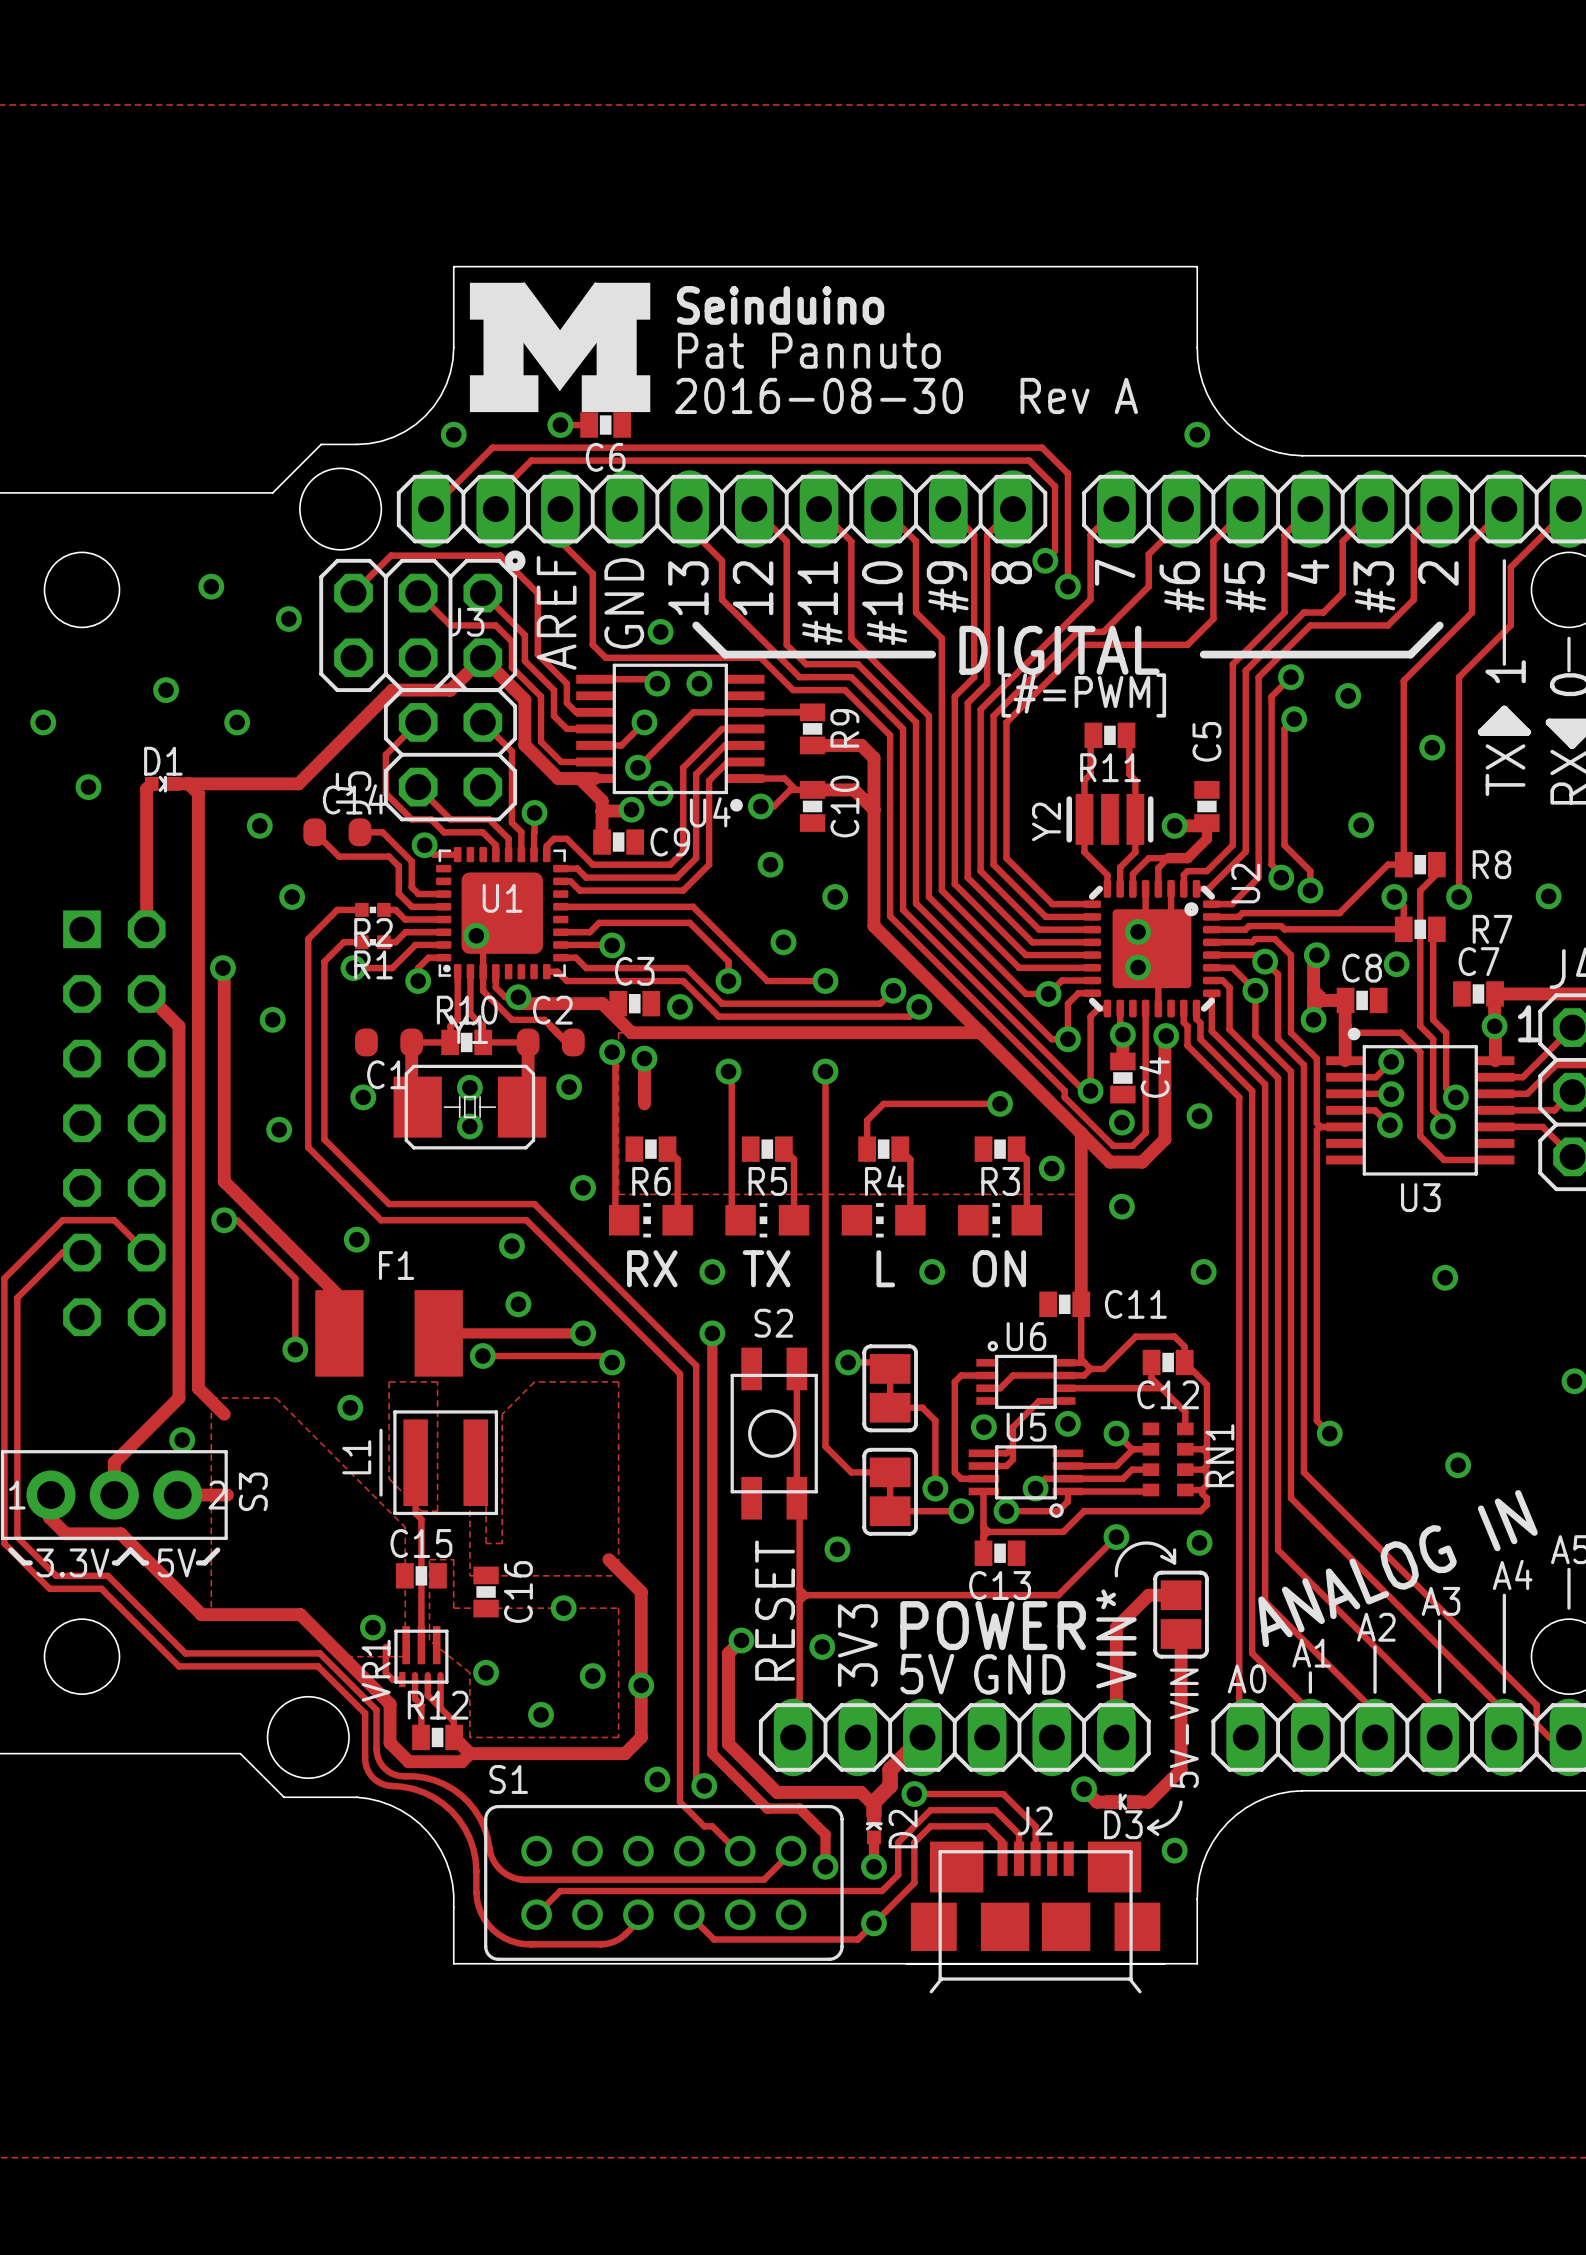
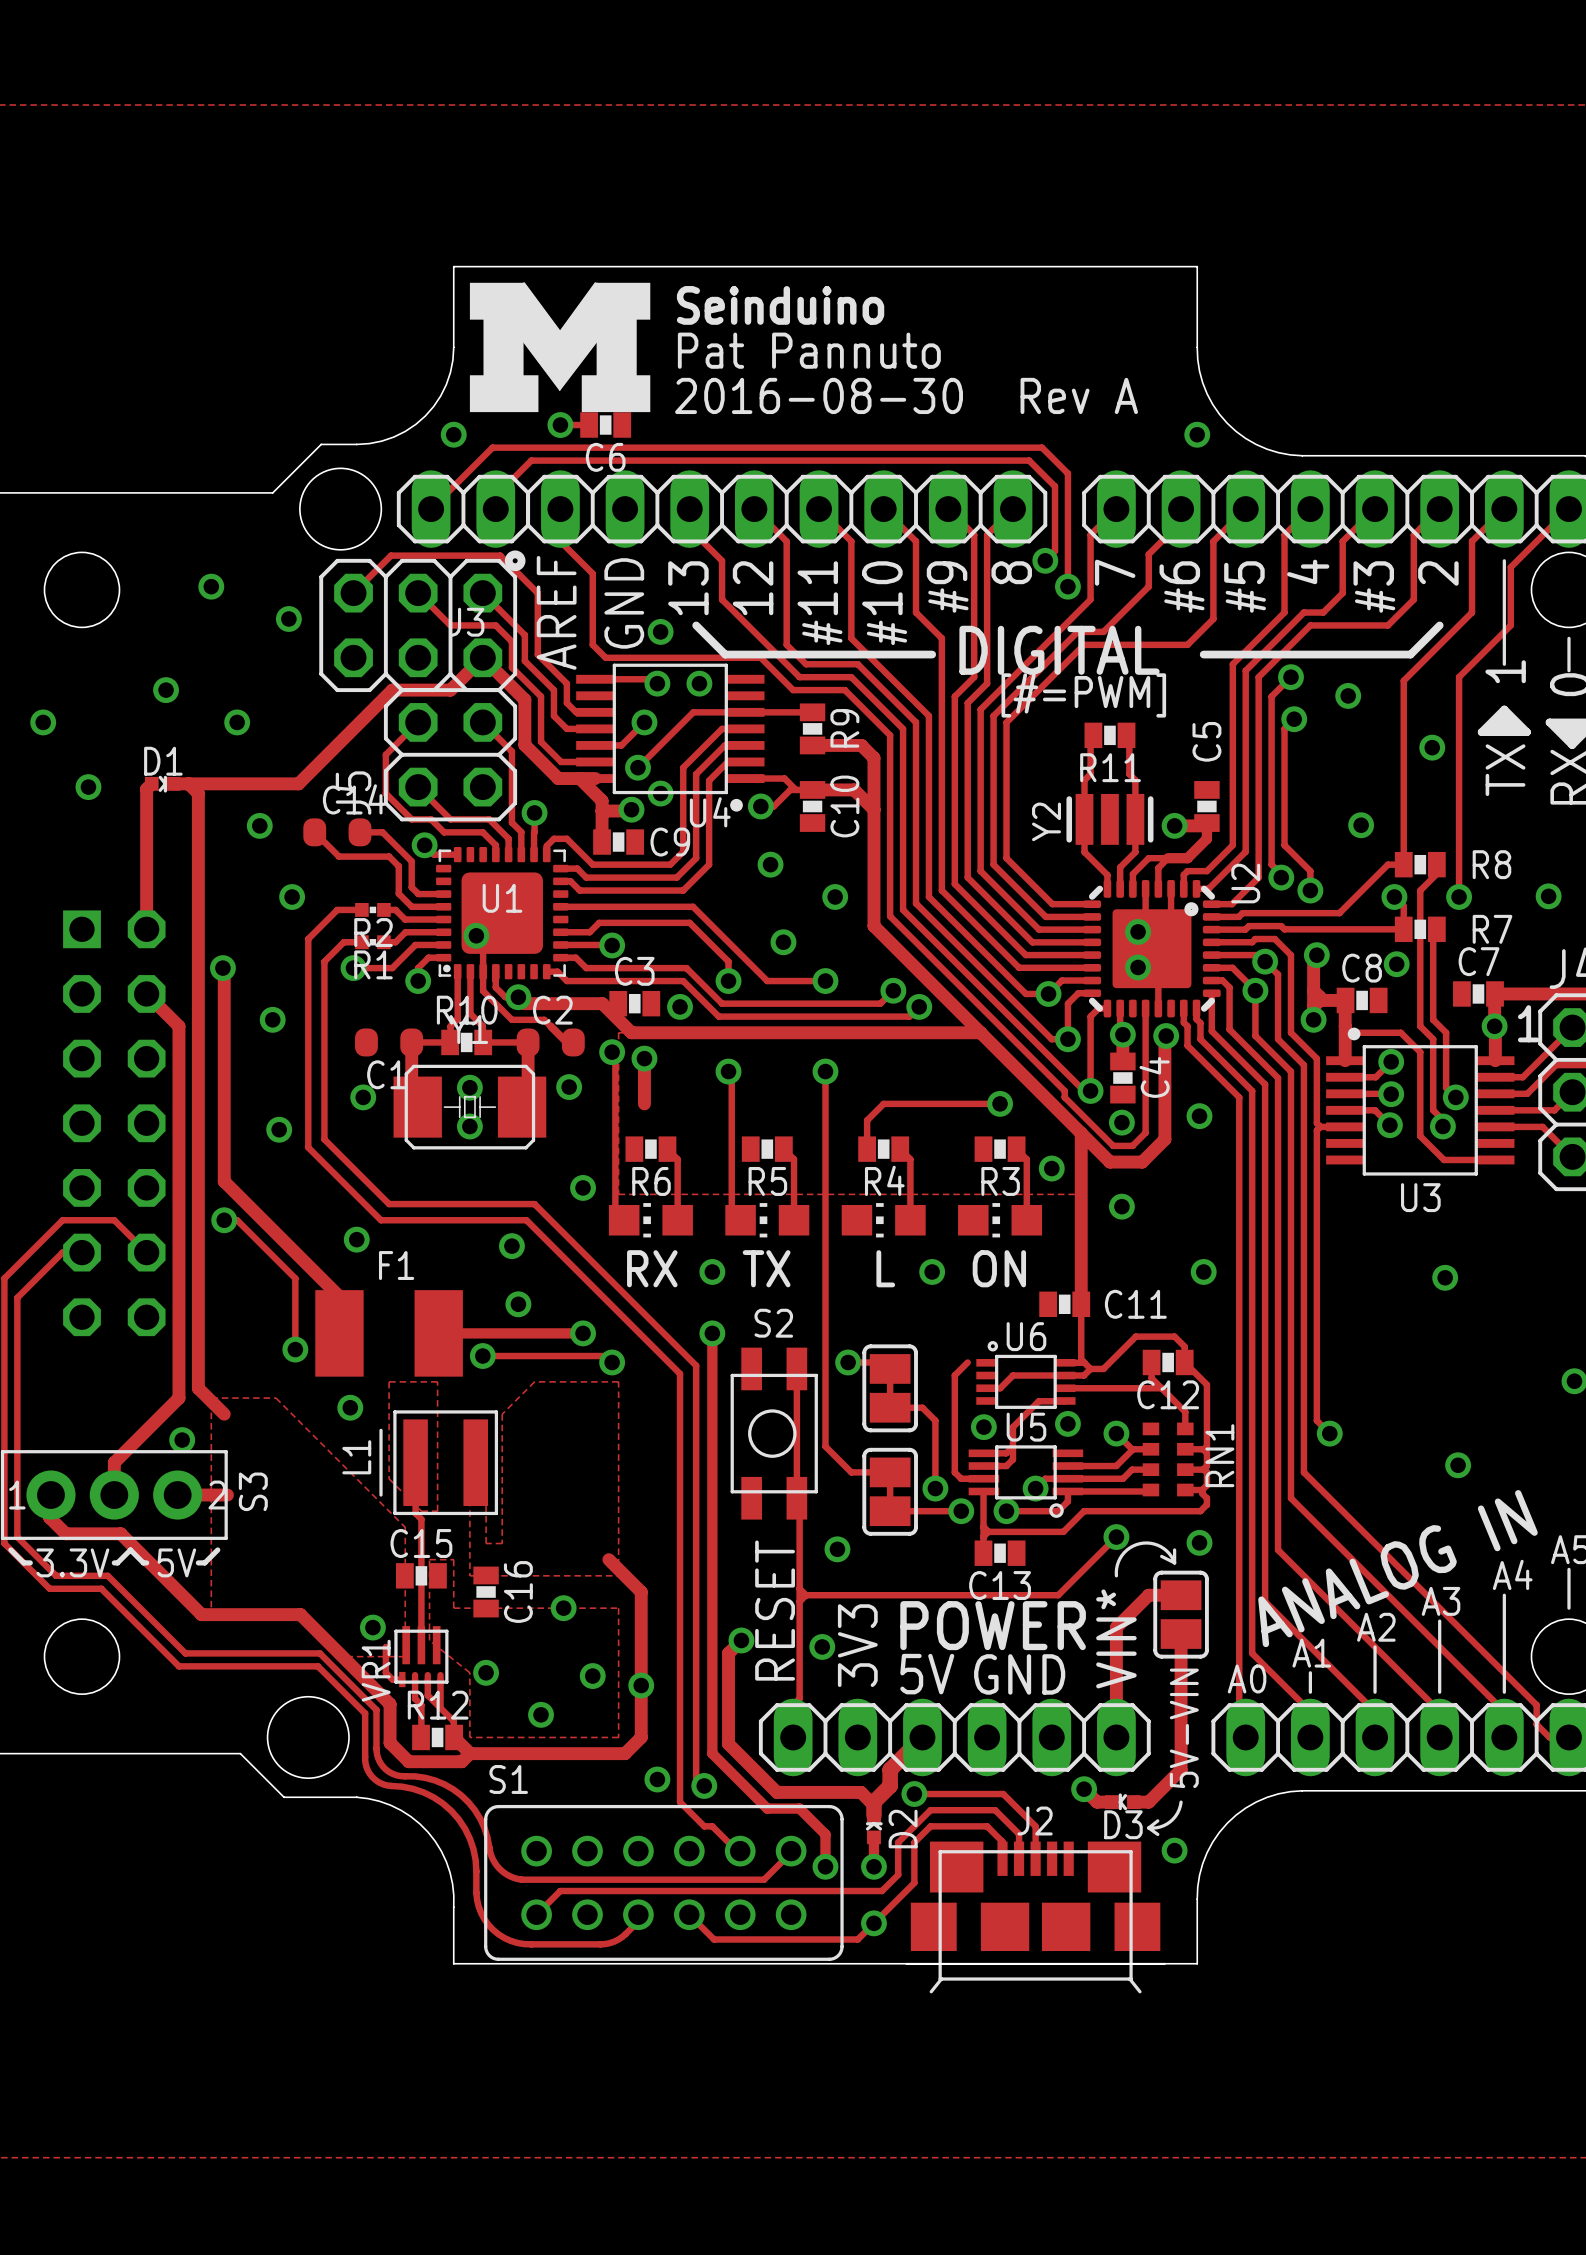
track: (986, 1375) (961, 1375) (954, 1381) -> (967, 1362) (954, 1375) (954, 1381)

